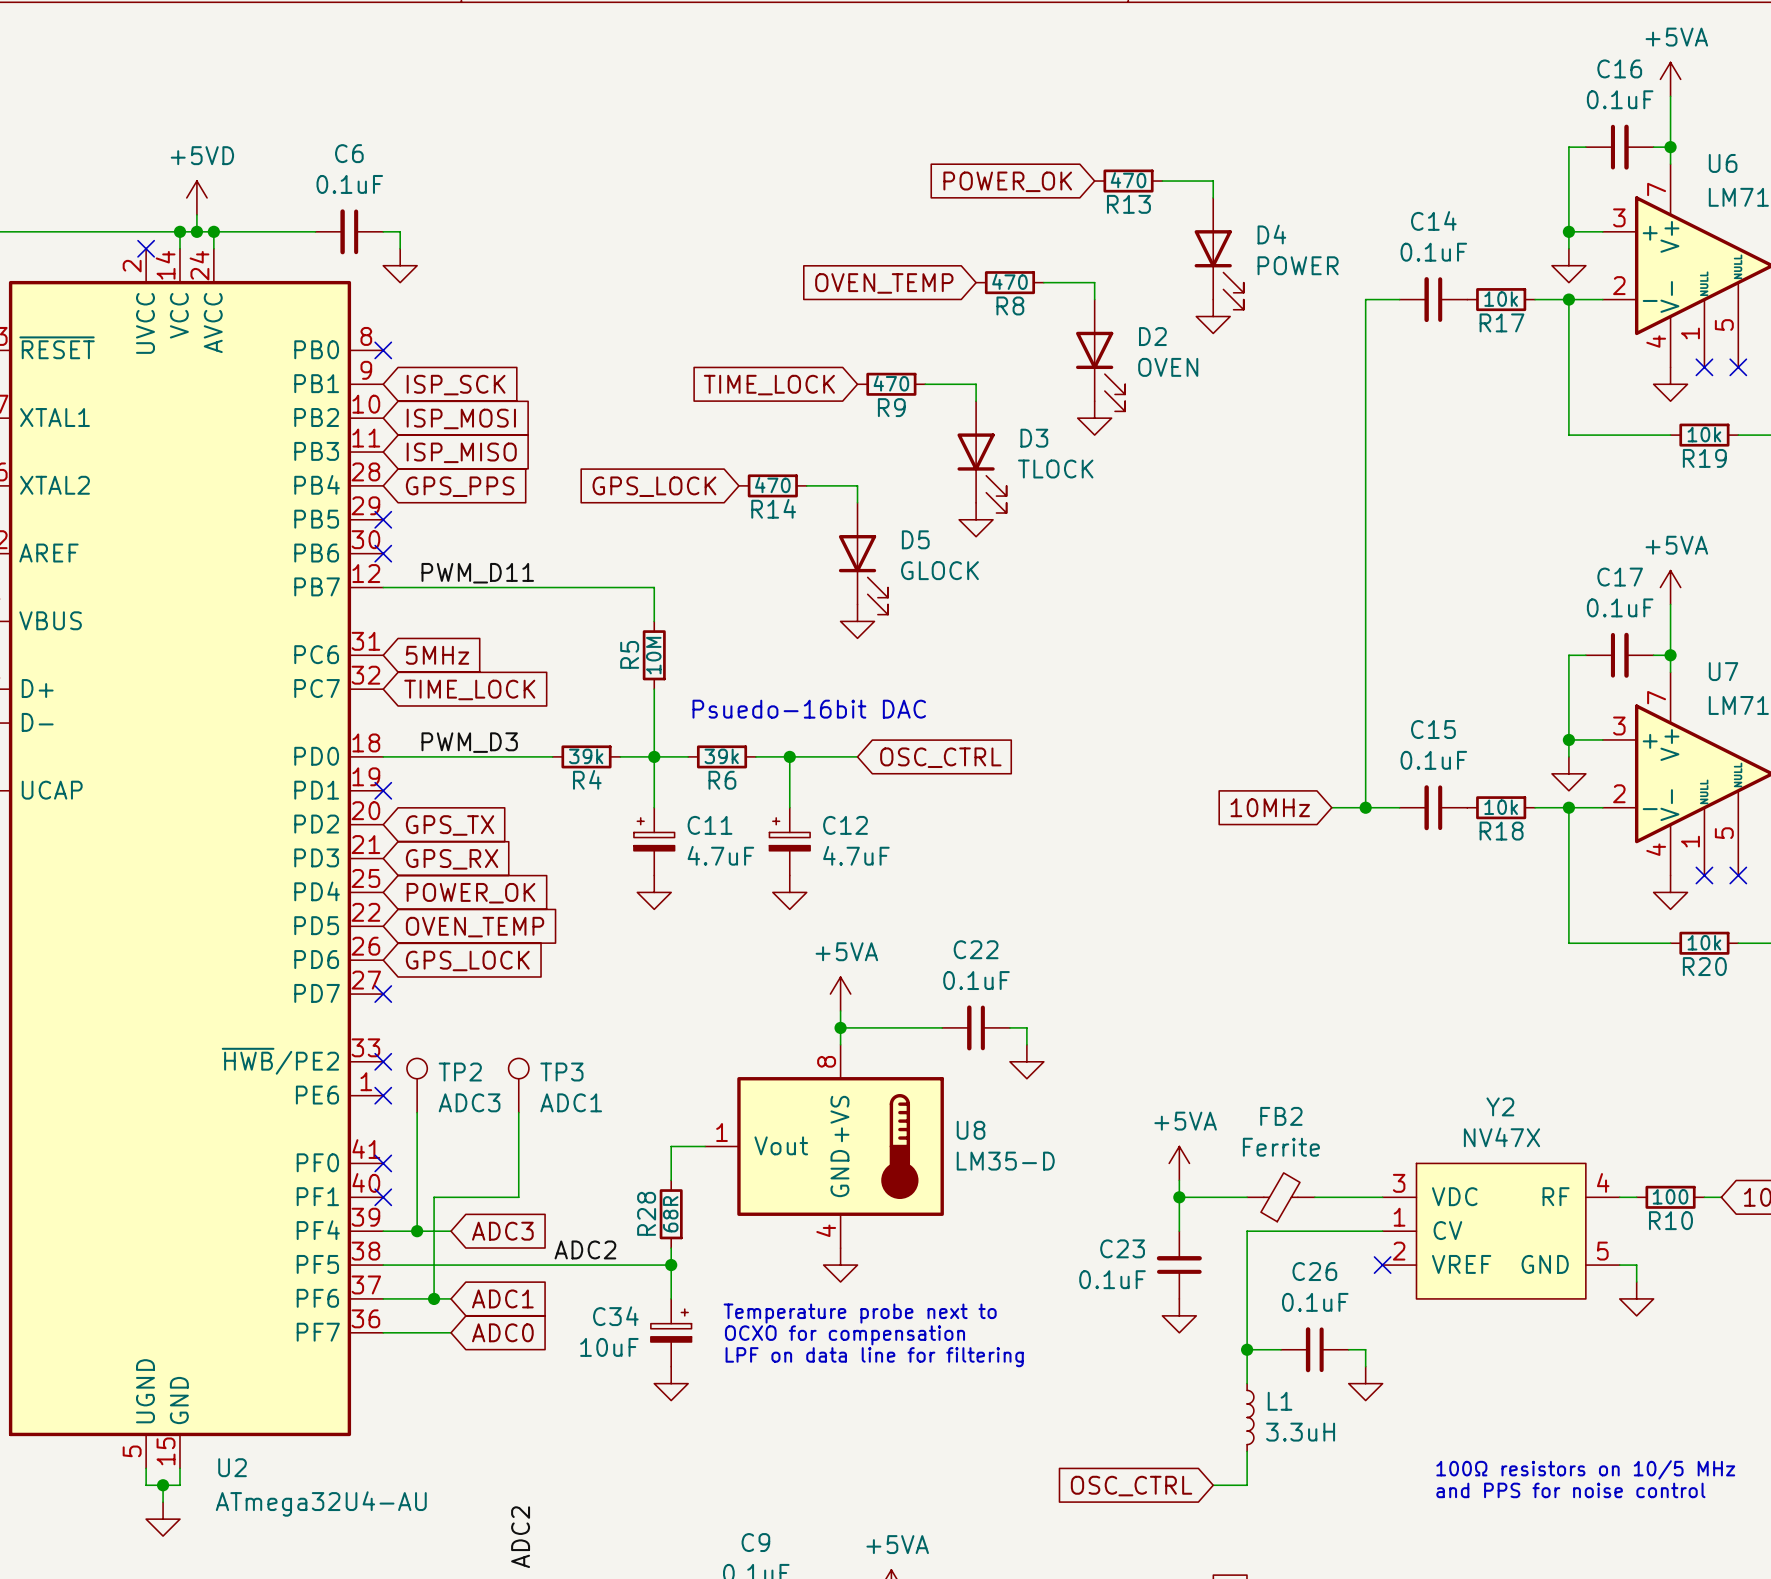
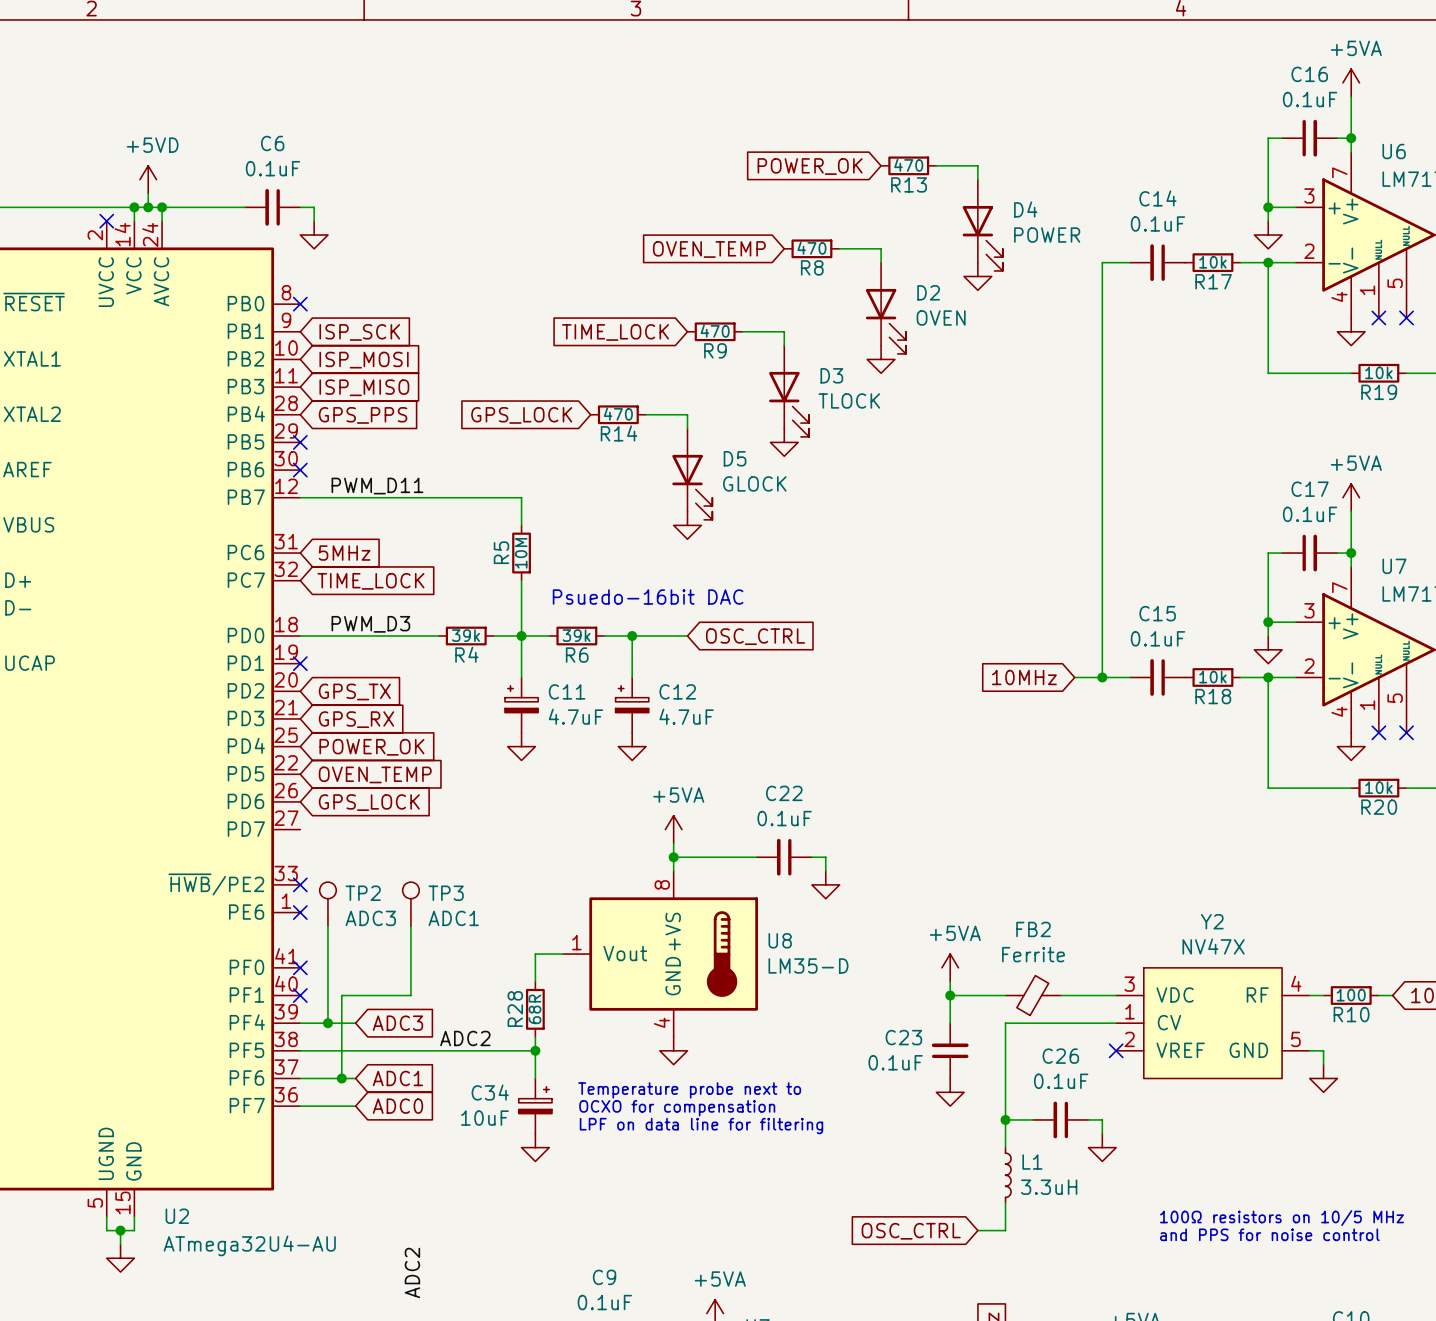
no-connect mark: (383, 994) -> none

